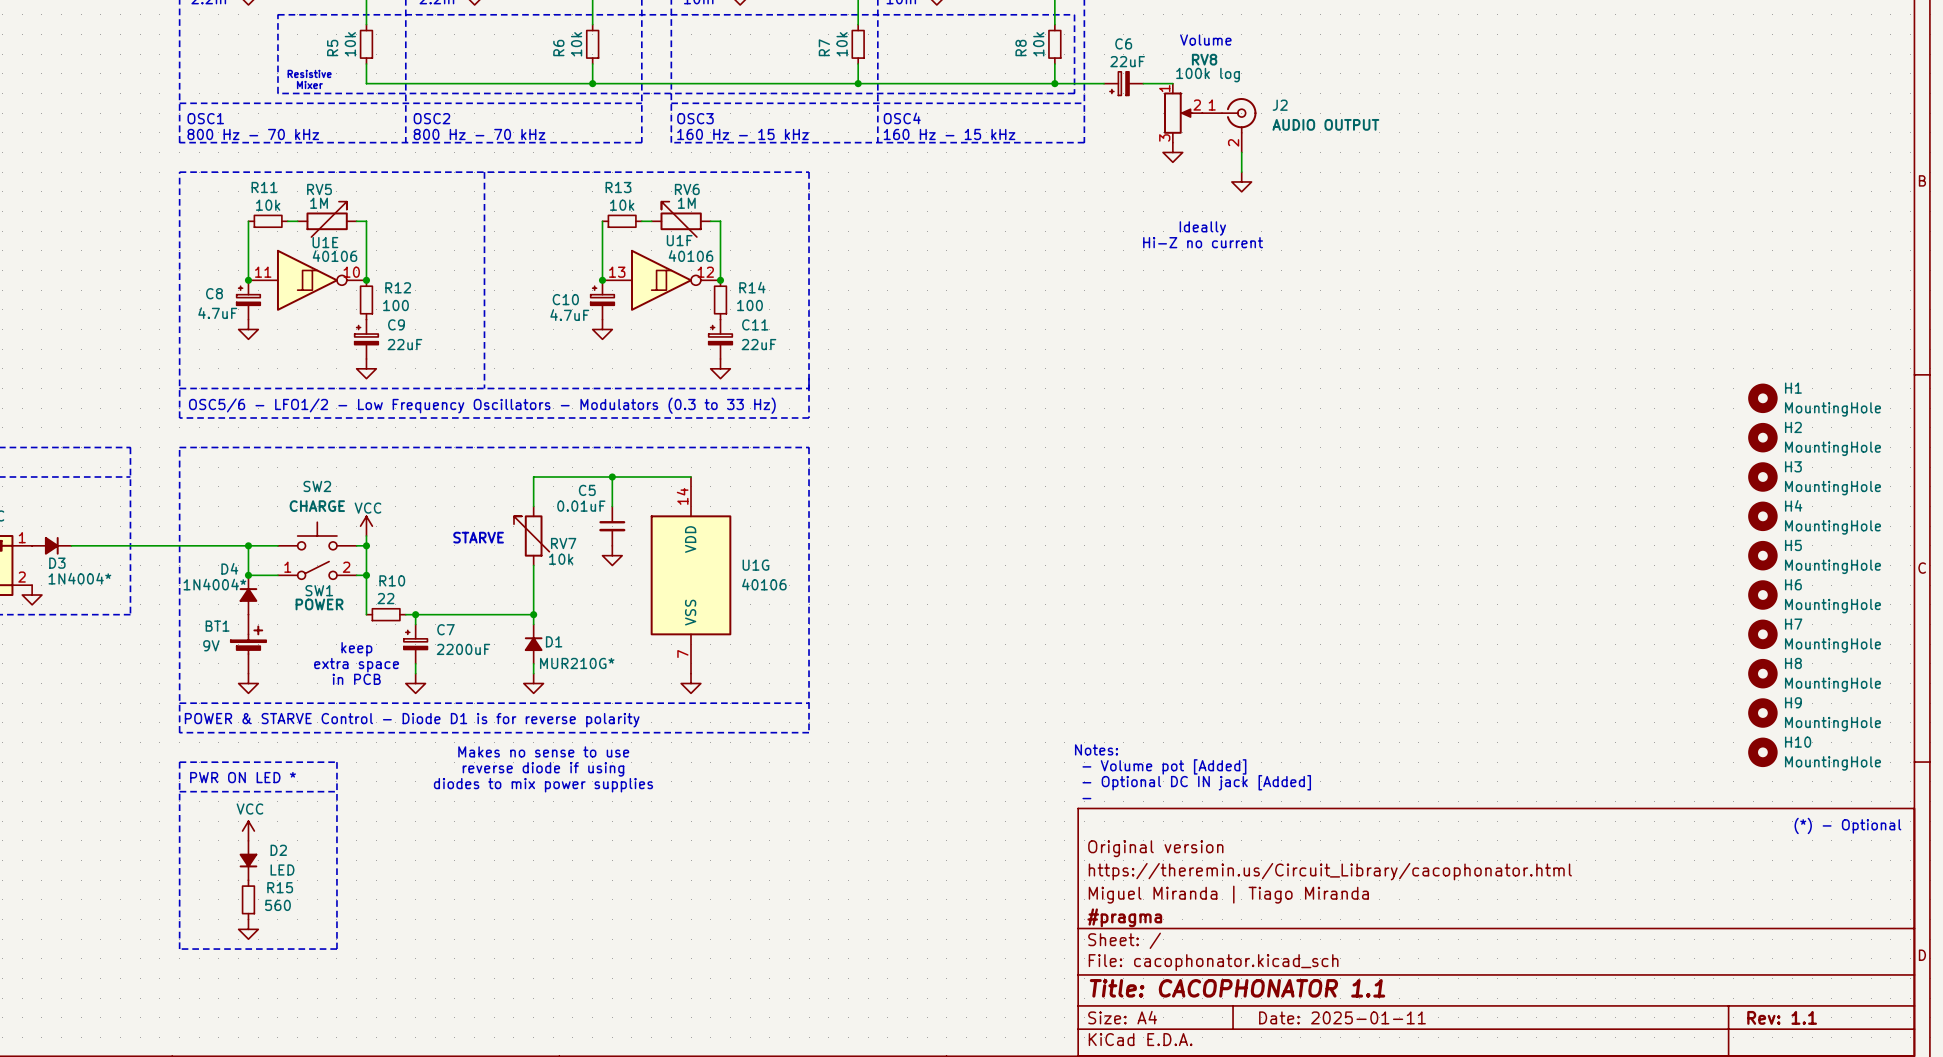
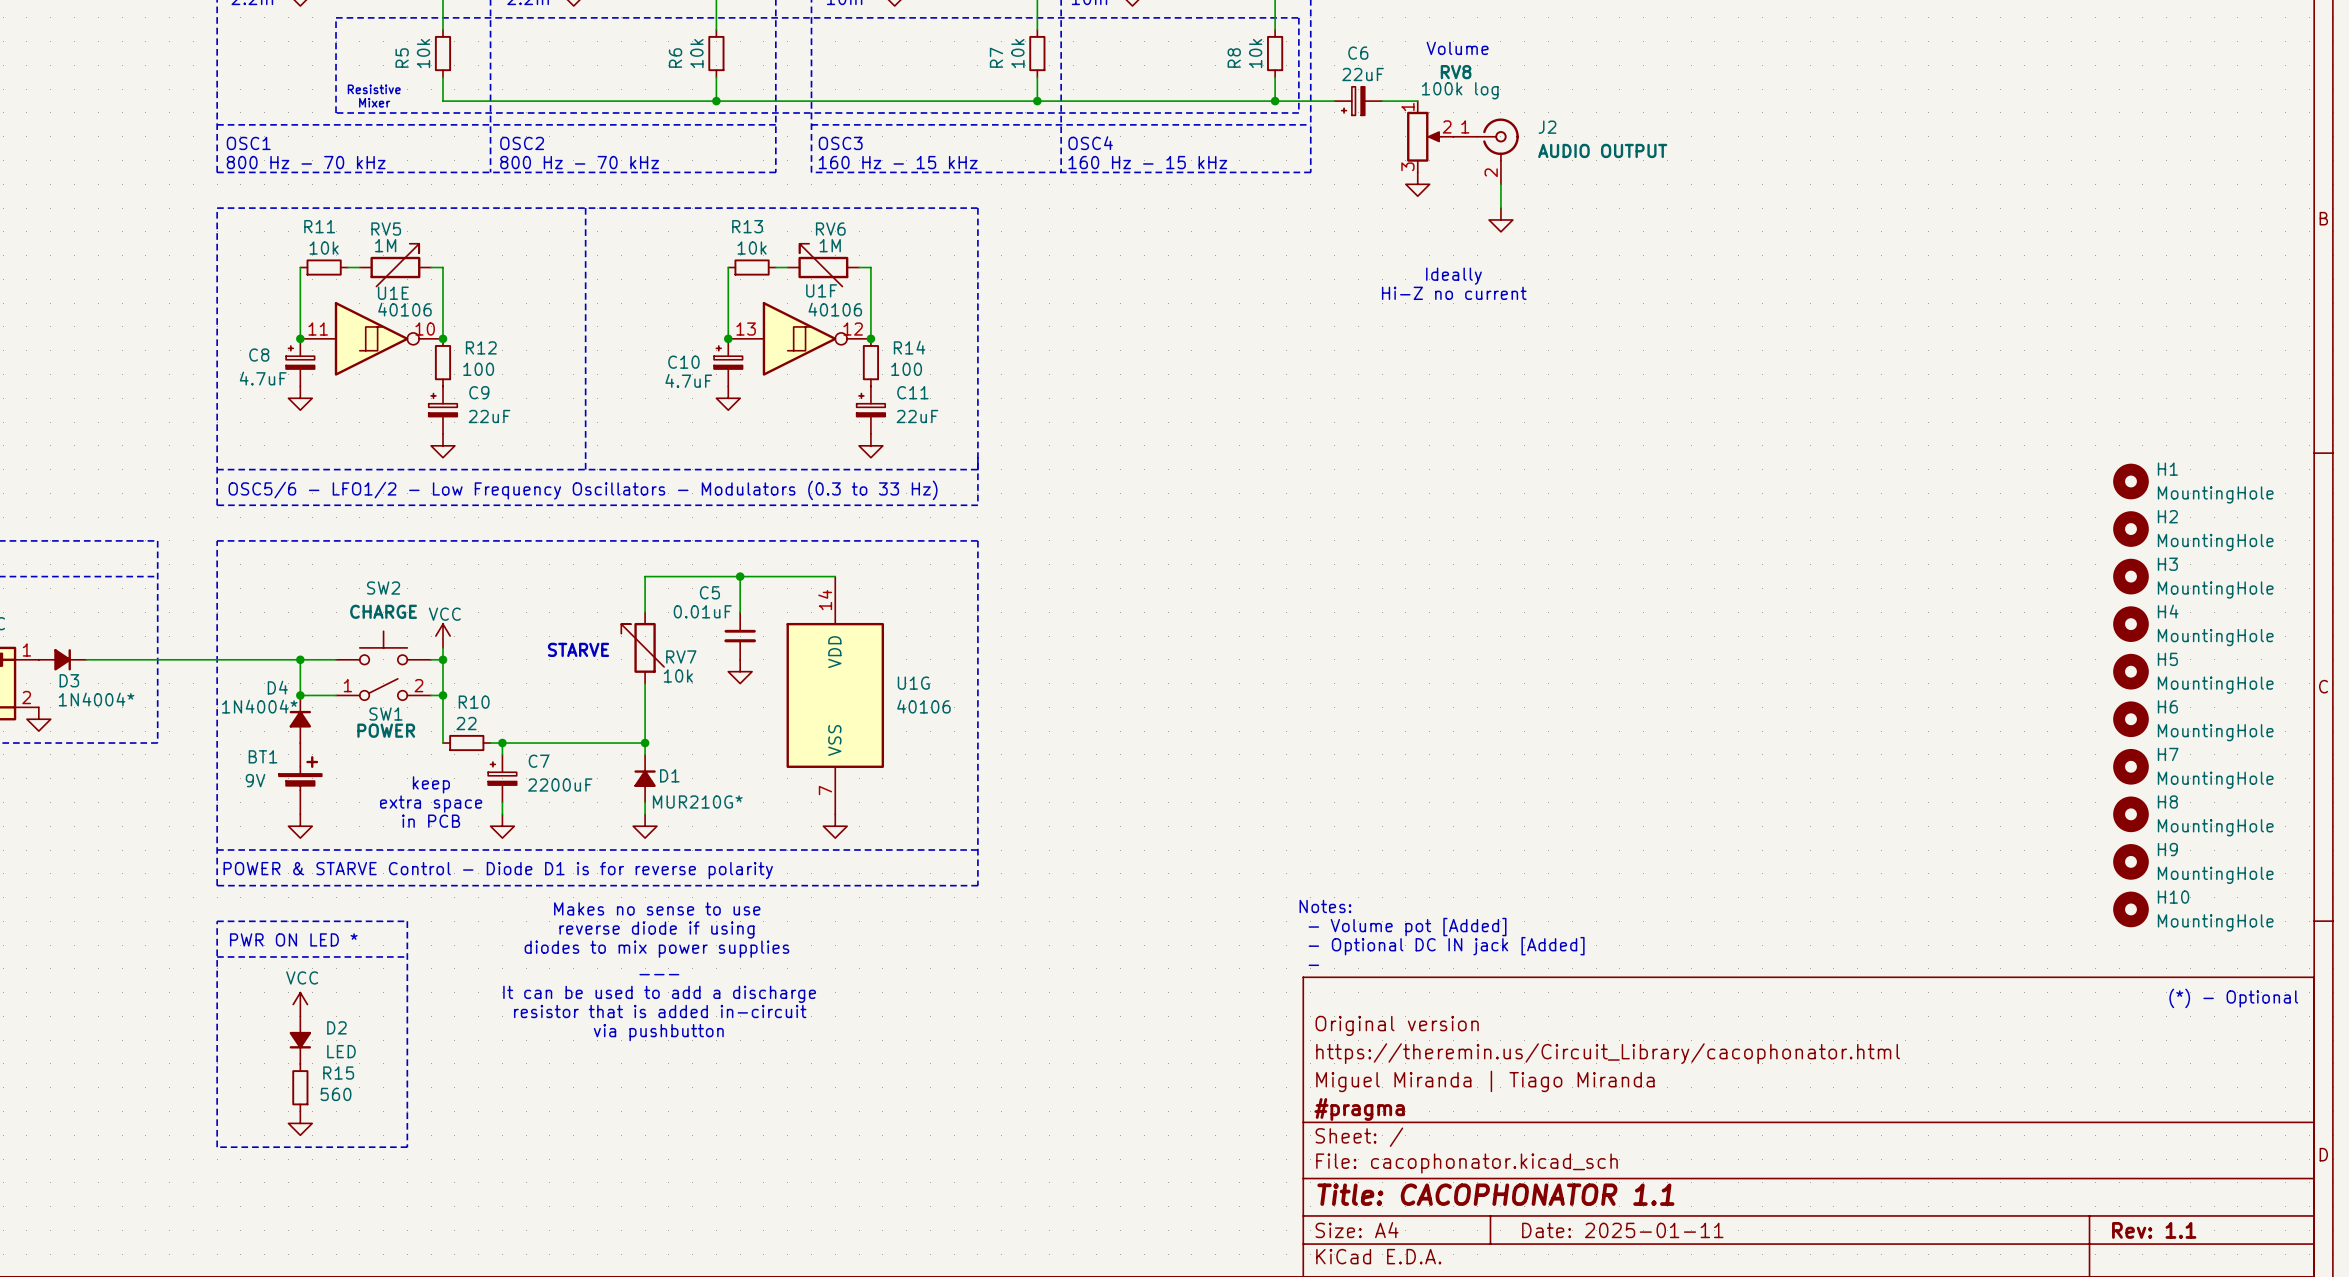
text: none -> --- (659, 974)
text: none -> It can be used to add a discharge (659, 994)
text: none -> resistor that is added in-circuit (660, 1011)
text: none -> via pushbutton (658, 1032)

